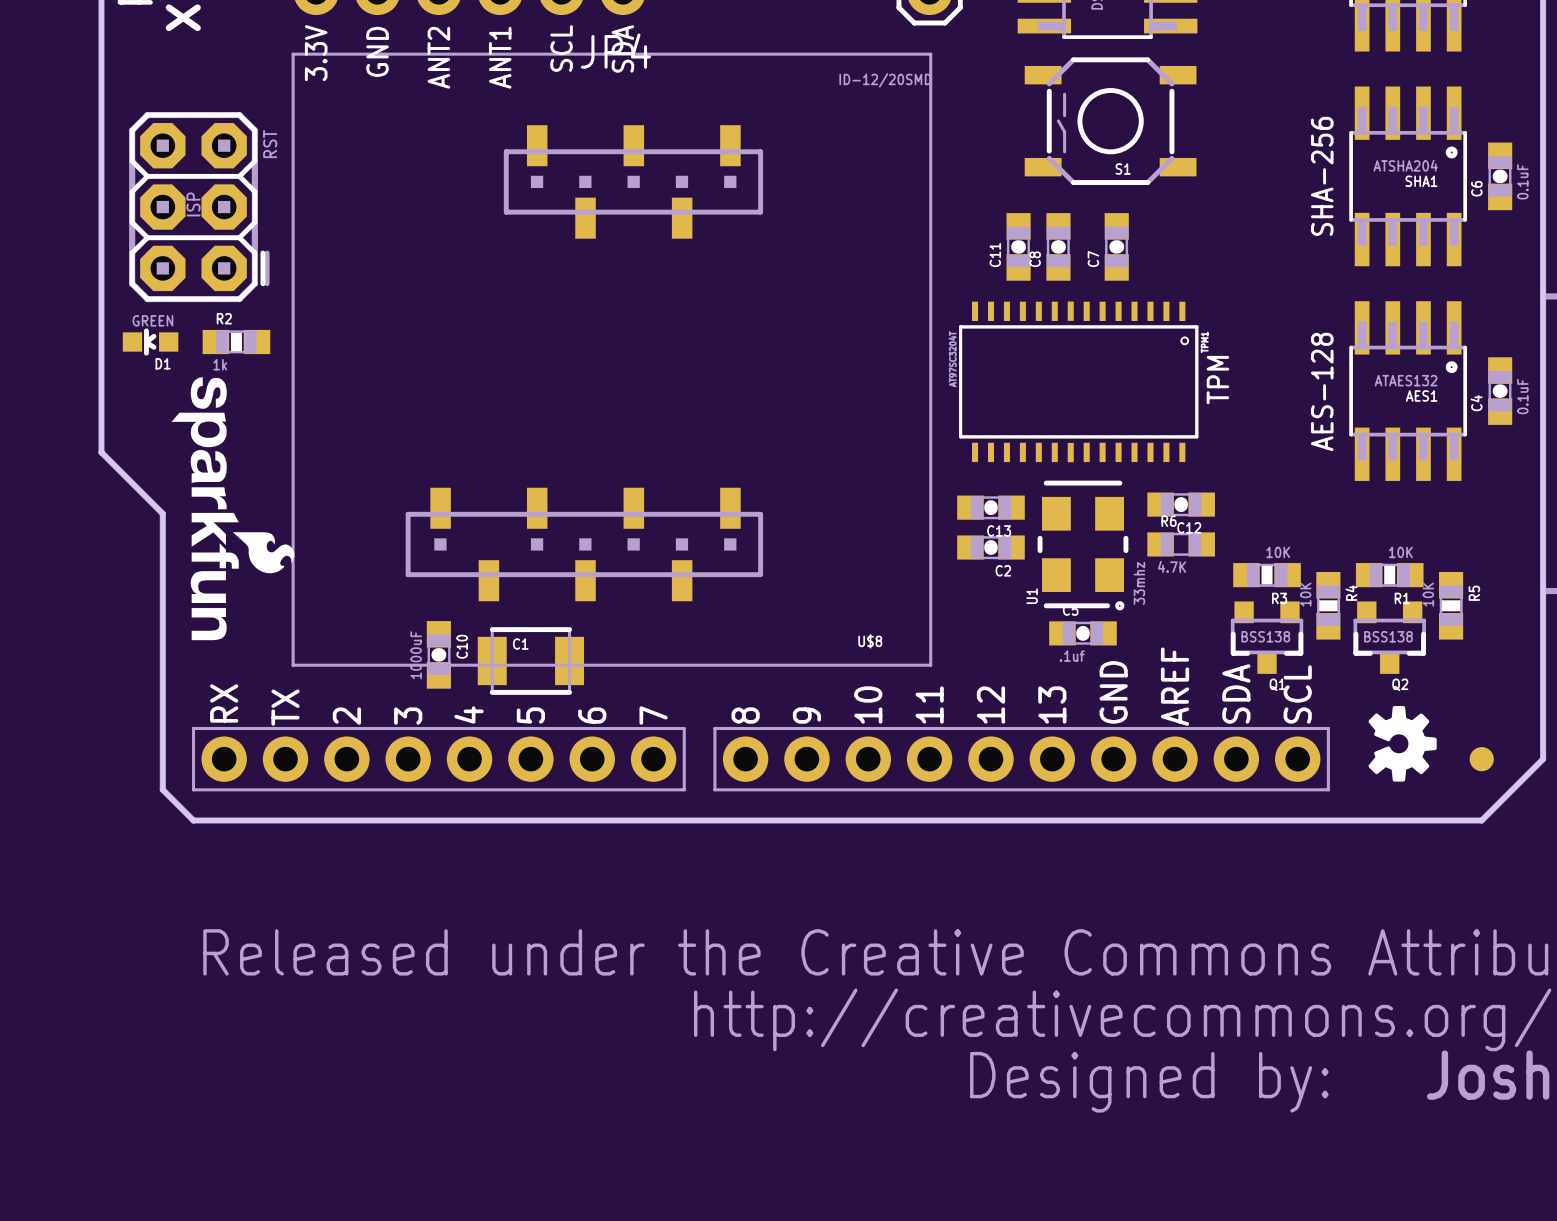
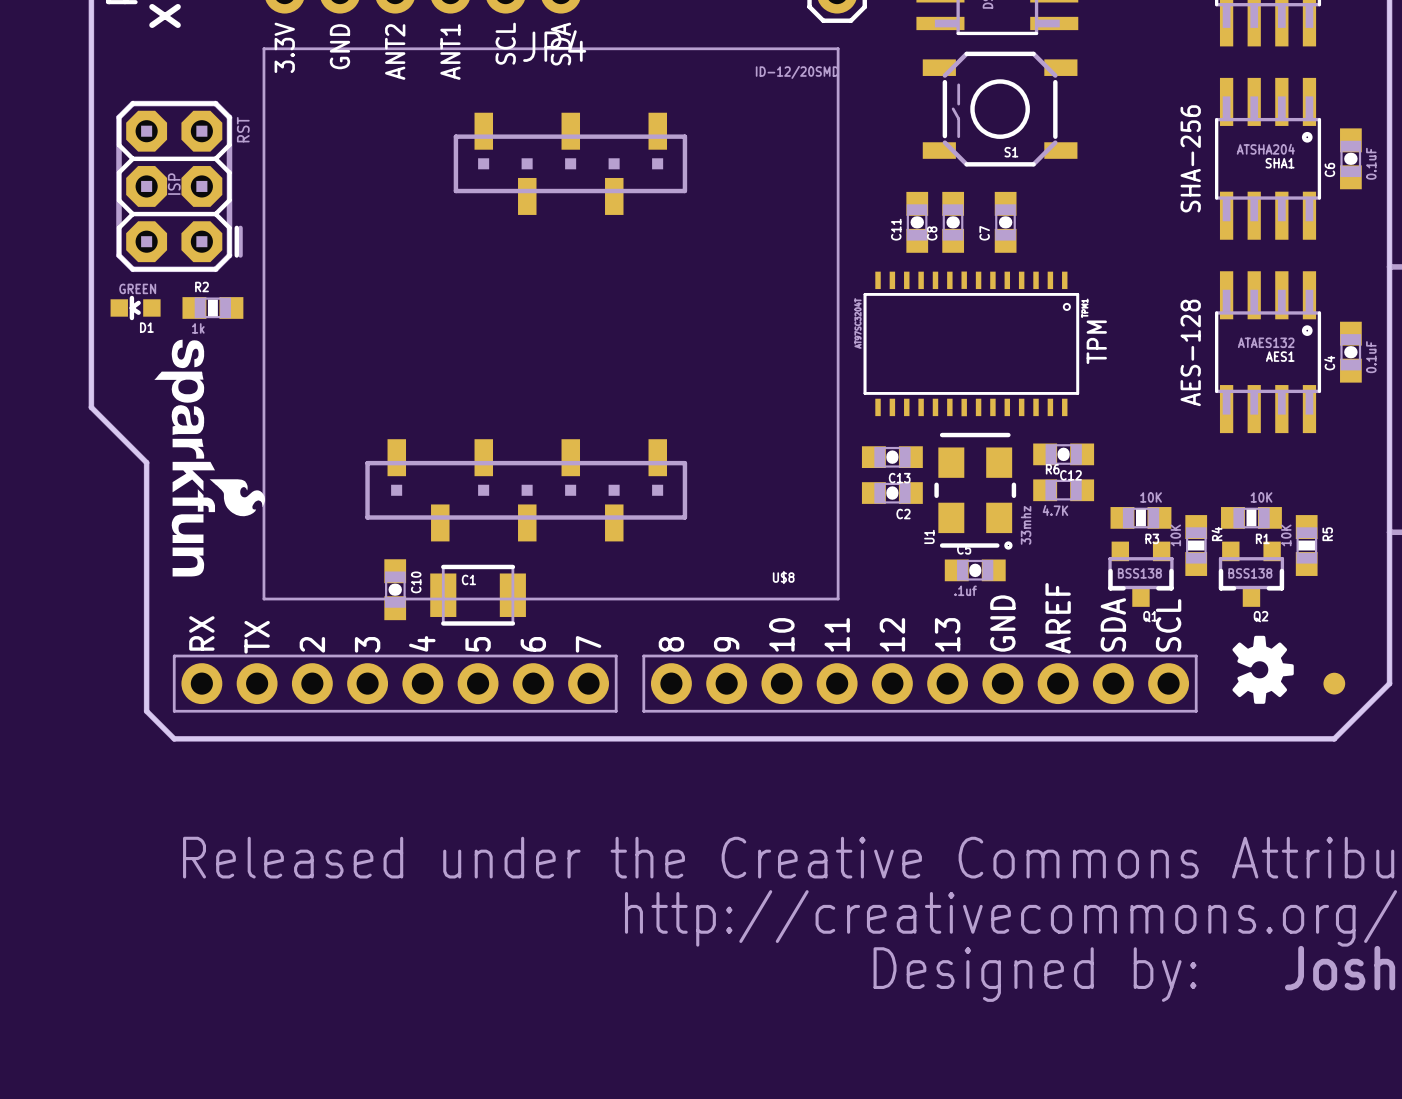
C10 value: 1000uF (416, 655) -> none

